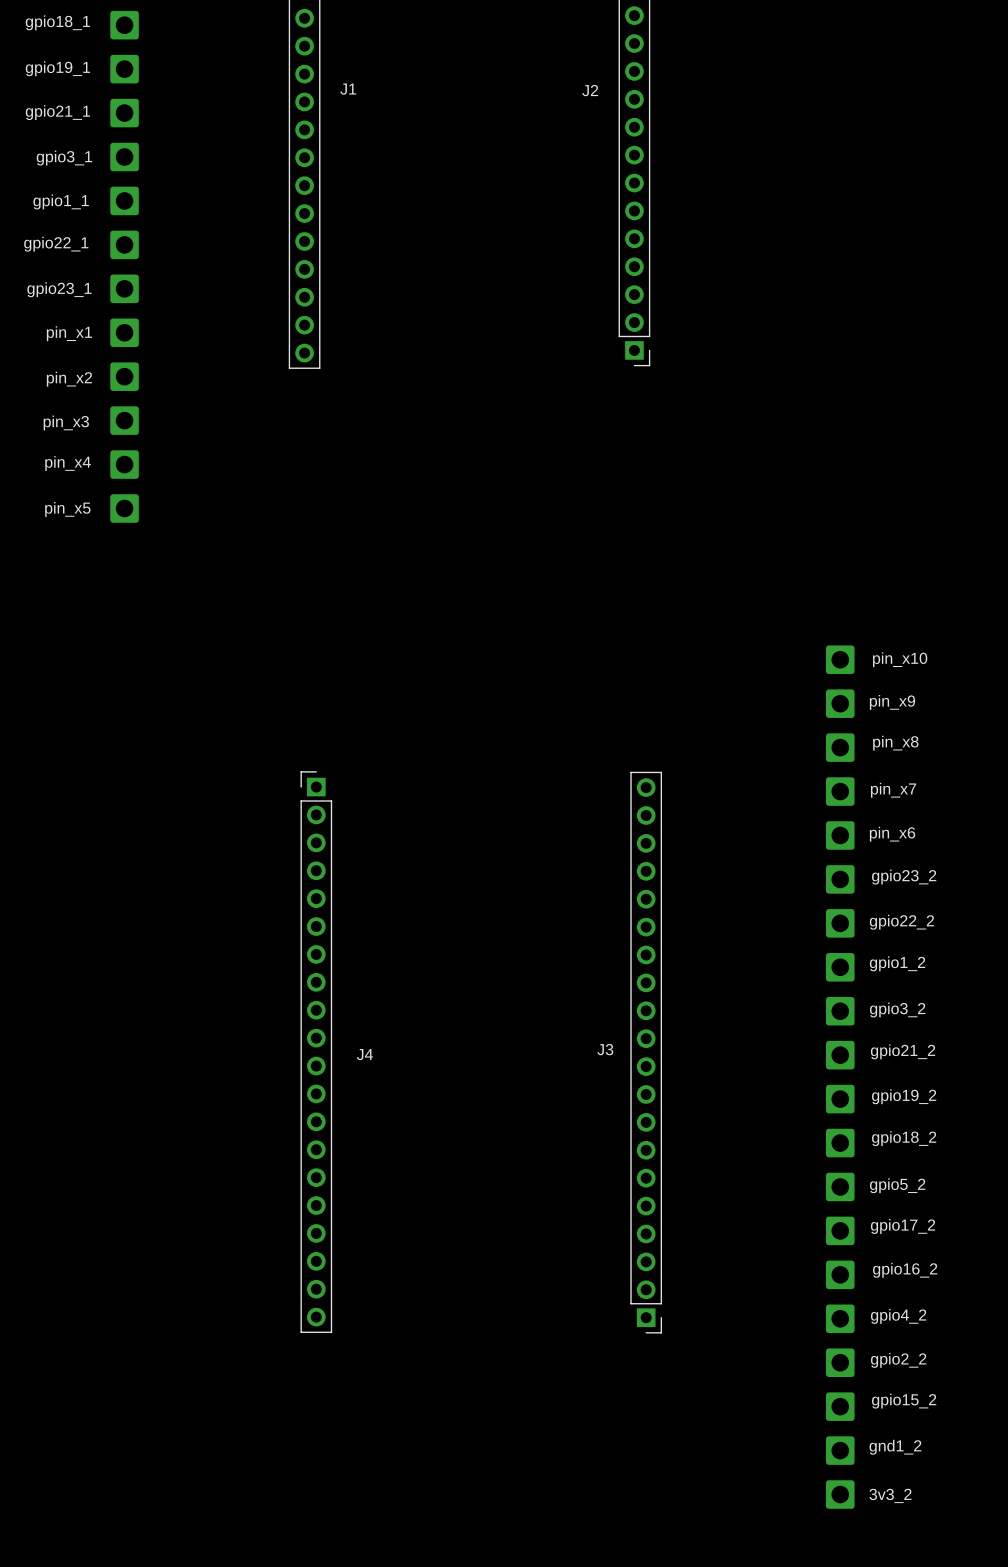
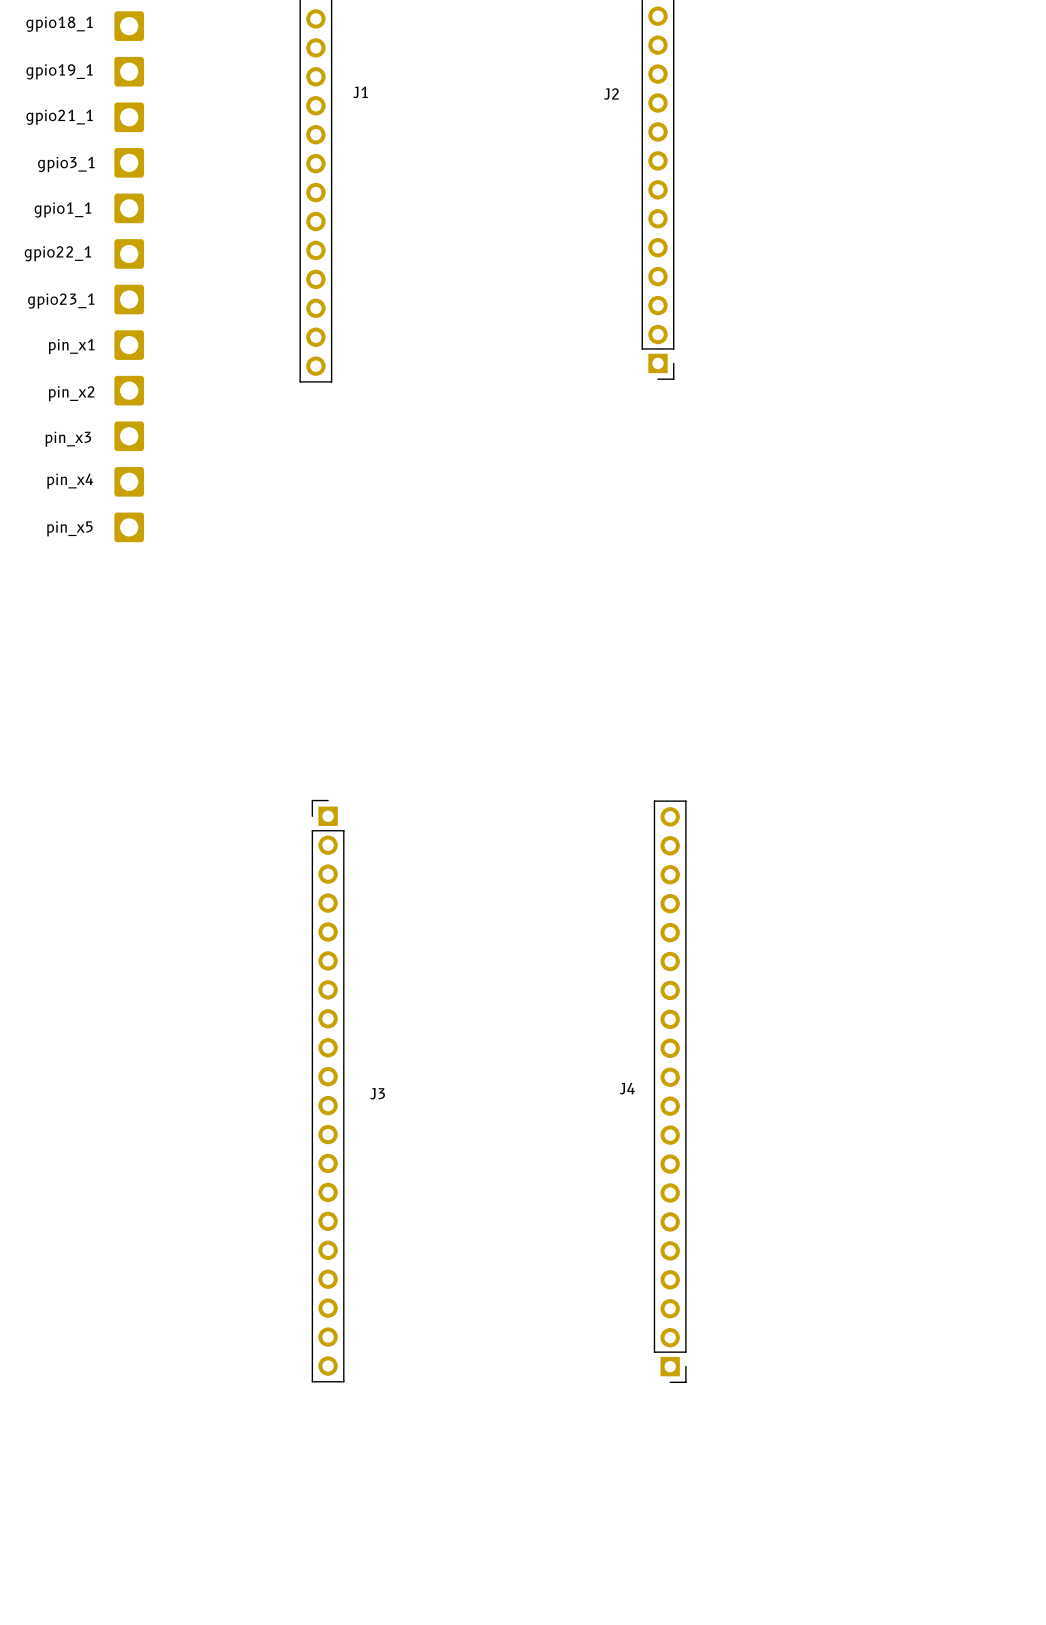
pin_x10: (840, 659) -> none
pin_x9: (840, 703) -> none
pin_x8: (840, 747) -> none
pin_x7: (840, 791) -> none
pin_x6: (840, 835) -> none
gpio23_2: (840, 879) -> none
gpio22_2: (840, 923) -> none
gpio1_2: (840, 967) -> none
gpio3_2: (840, 1011) -> none
J3 name: J3 (605, 1049) -> J4 (627, 1088)
J4 name: J4 (364, 1054) -> J3 (377, 1093)
gpio21_2: (840, 1055) -> none
gpio19_2: (840, 1099) -> none
gpio18_2: (840, 1143) -> none
gpio5_2: (840, 1186) -> none
gpio17_2: (840, 1230) -> none
gpio16_2: (840, 1274) -> none
gpio4_2: (840, 1318) -> none
gpio2_2: (840, 1362) -> none
gpio15_2: (840, 1406) -> none
gnd1_2: (840, 1450) -> none
3v3_2: (840, 1494) -> none

